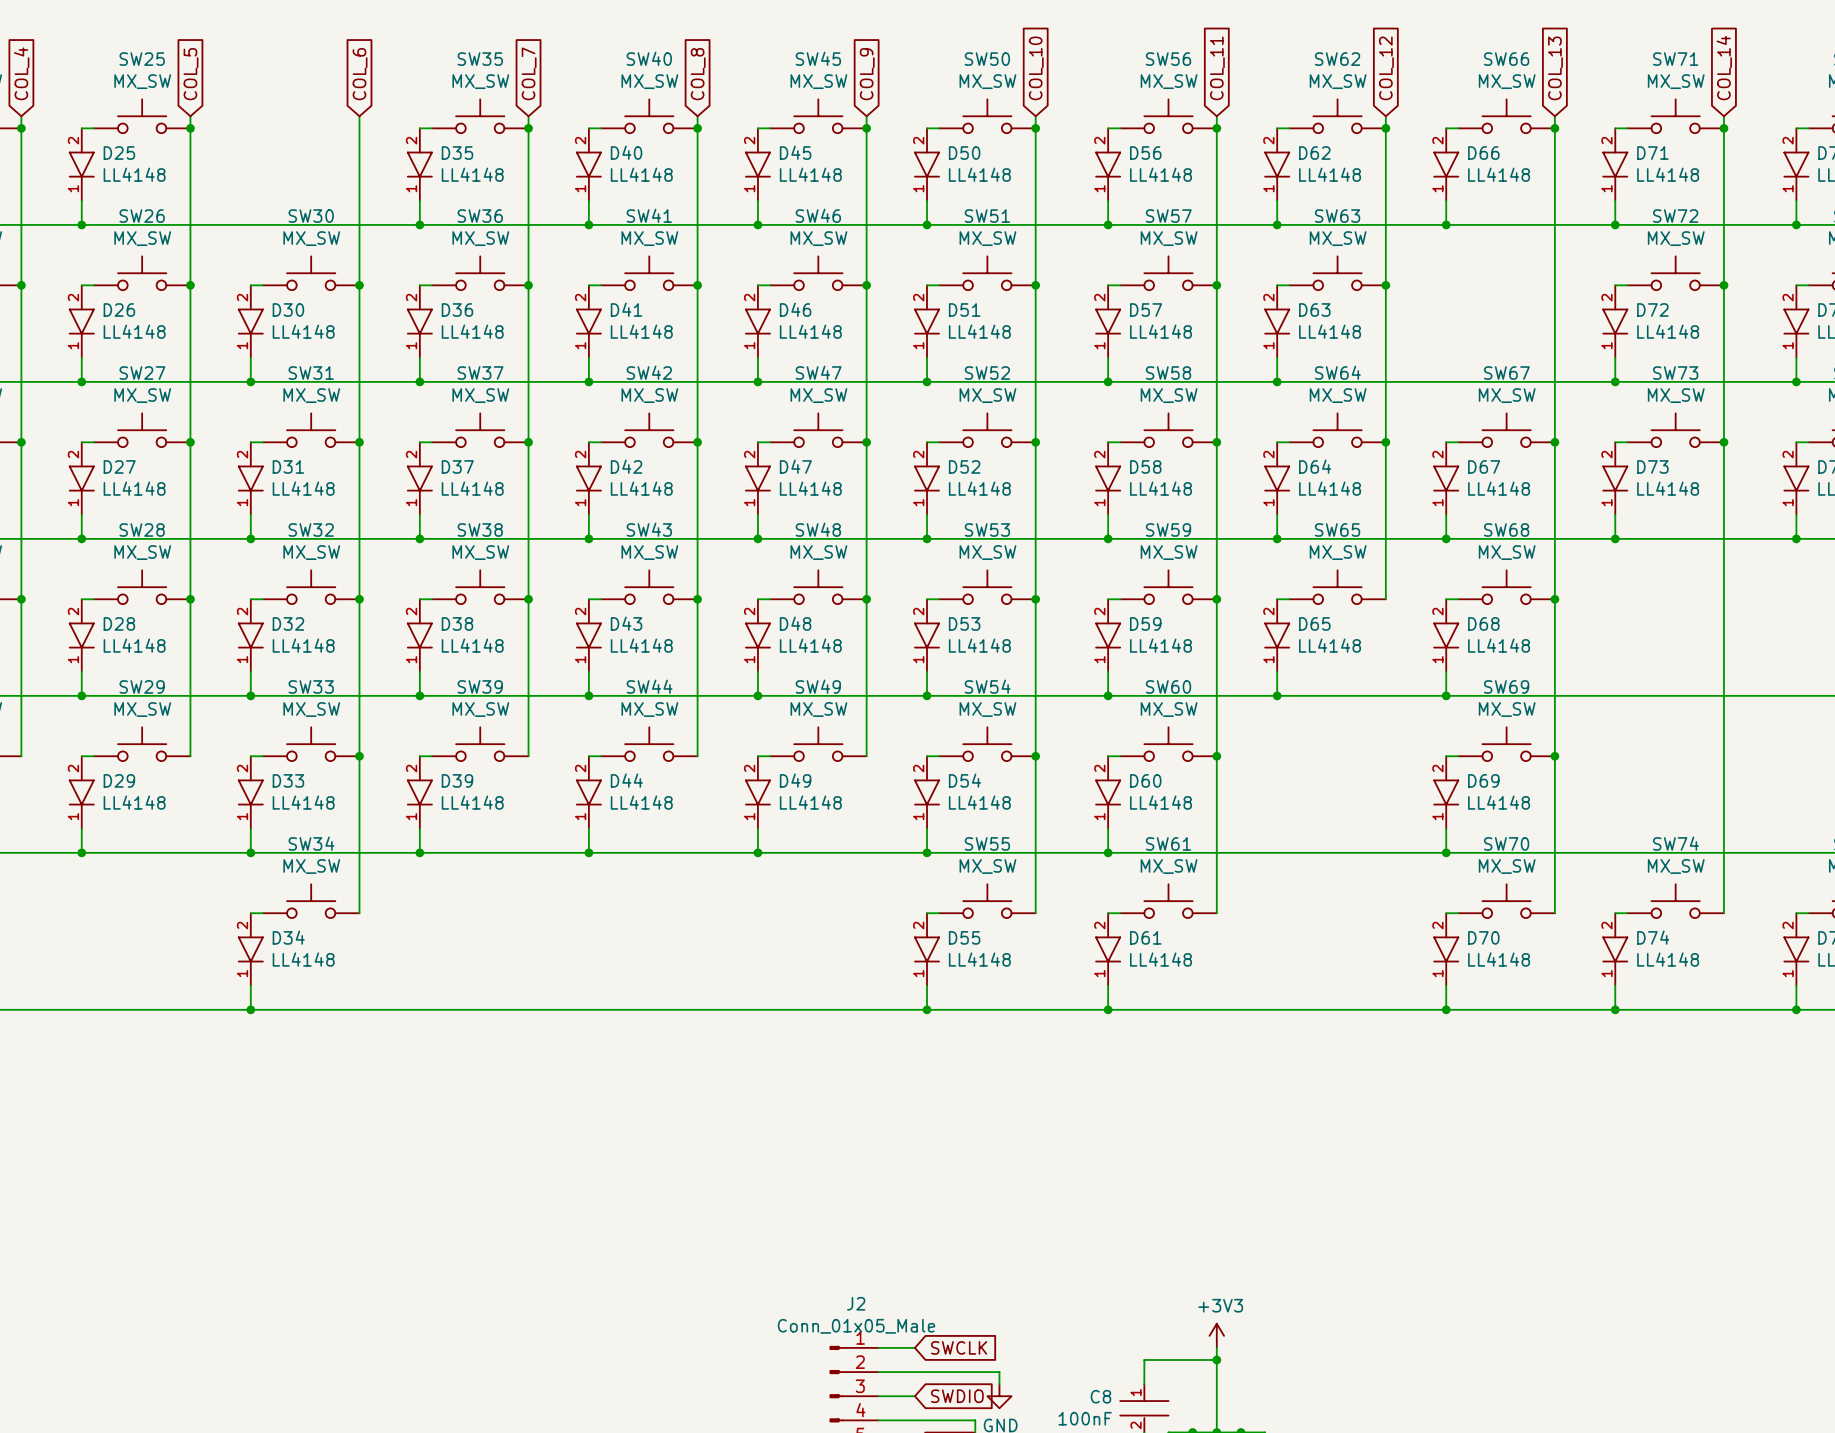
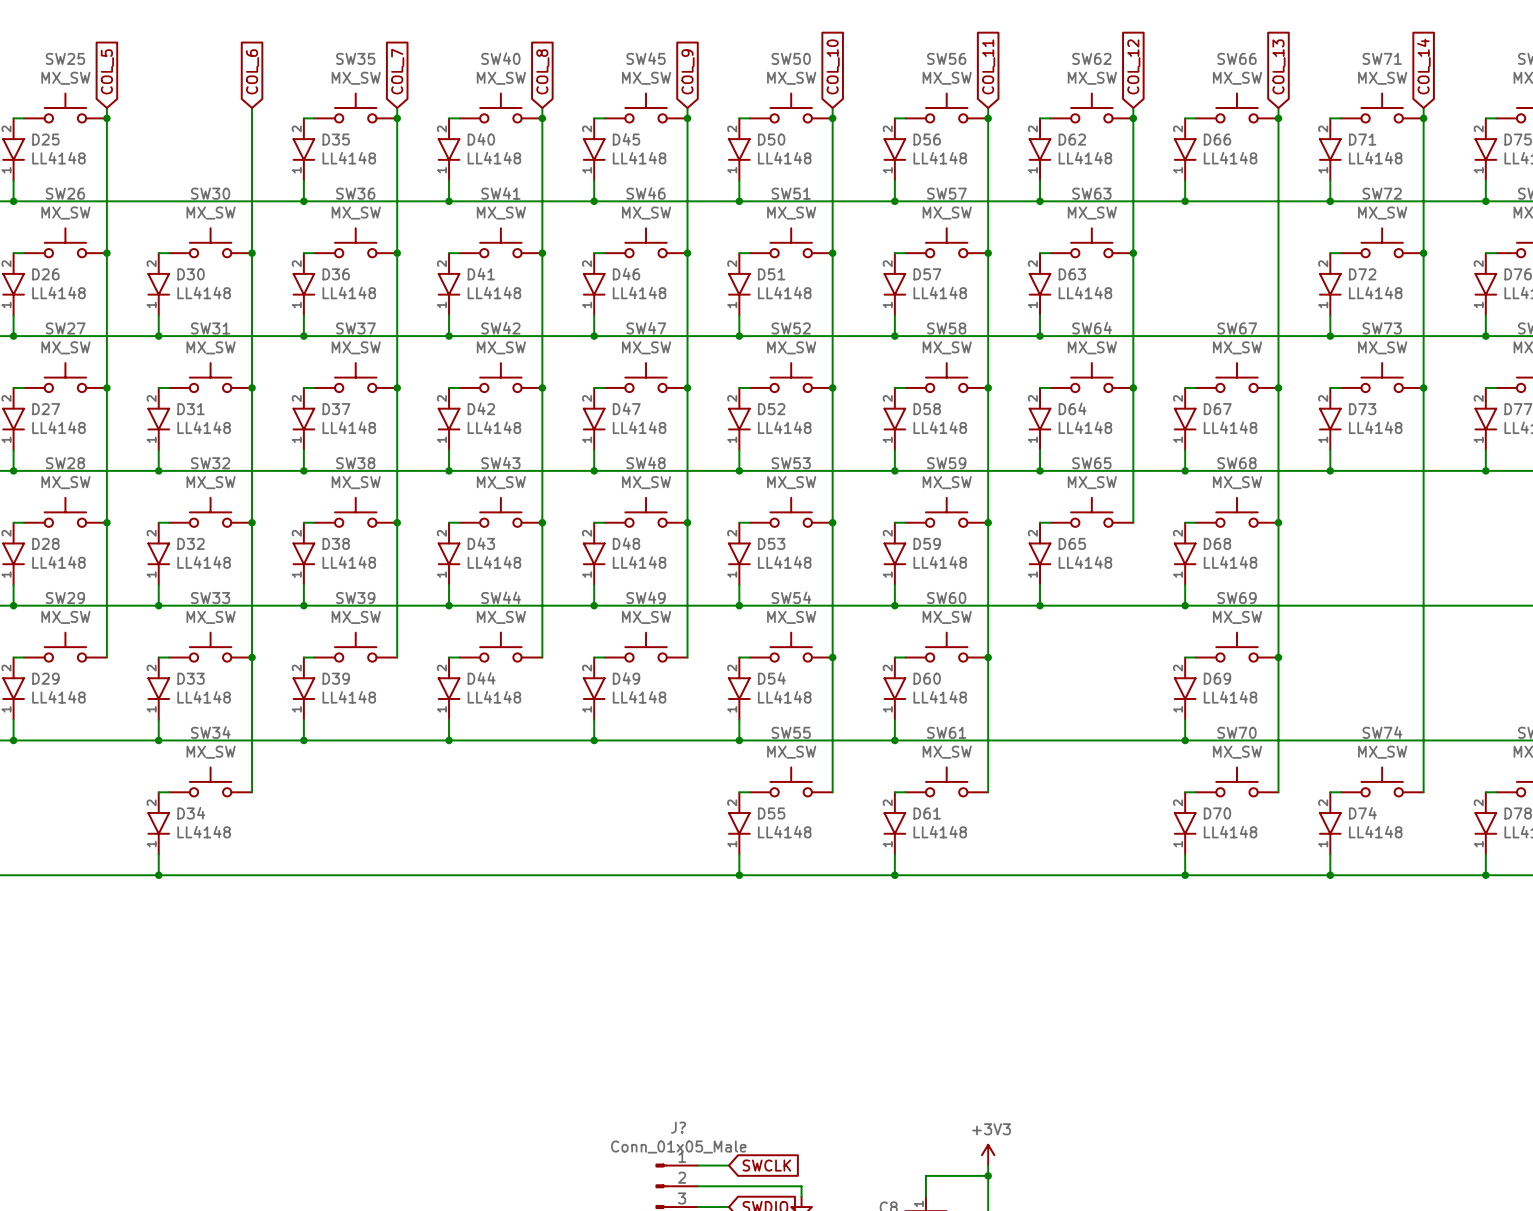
J2 name: J2 (856, 1303) -> J? (678, 1127)

